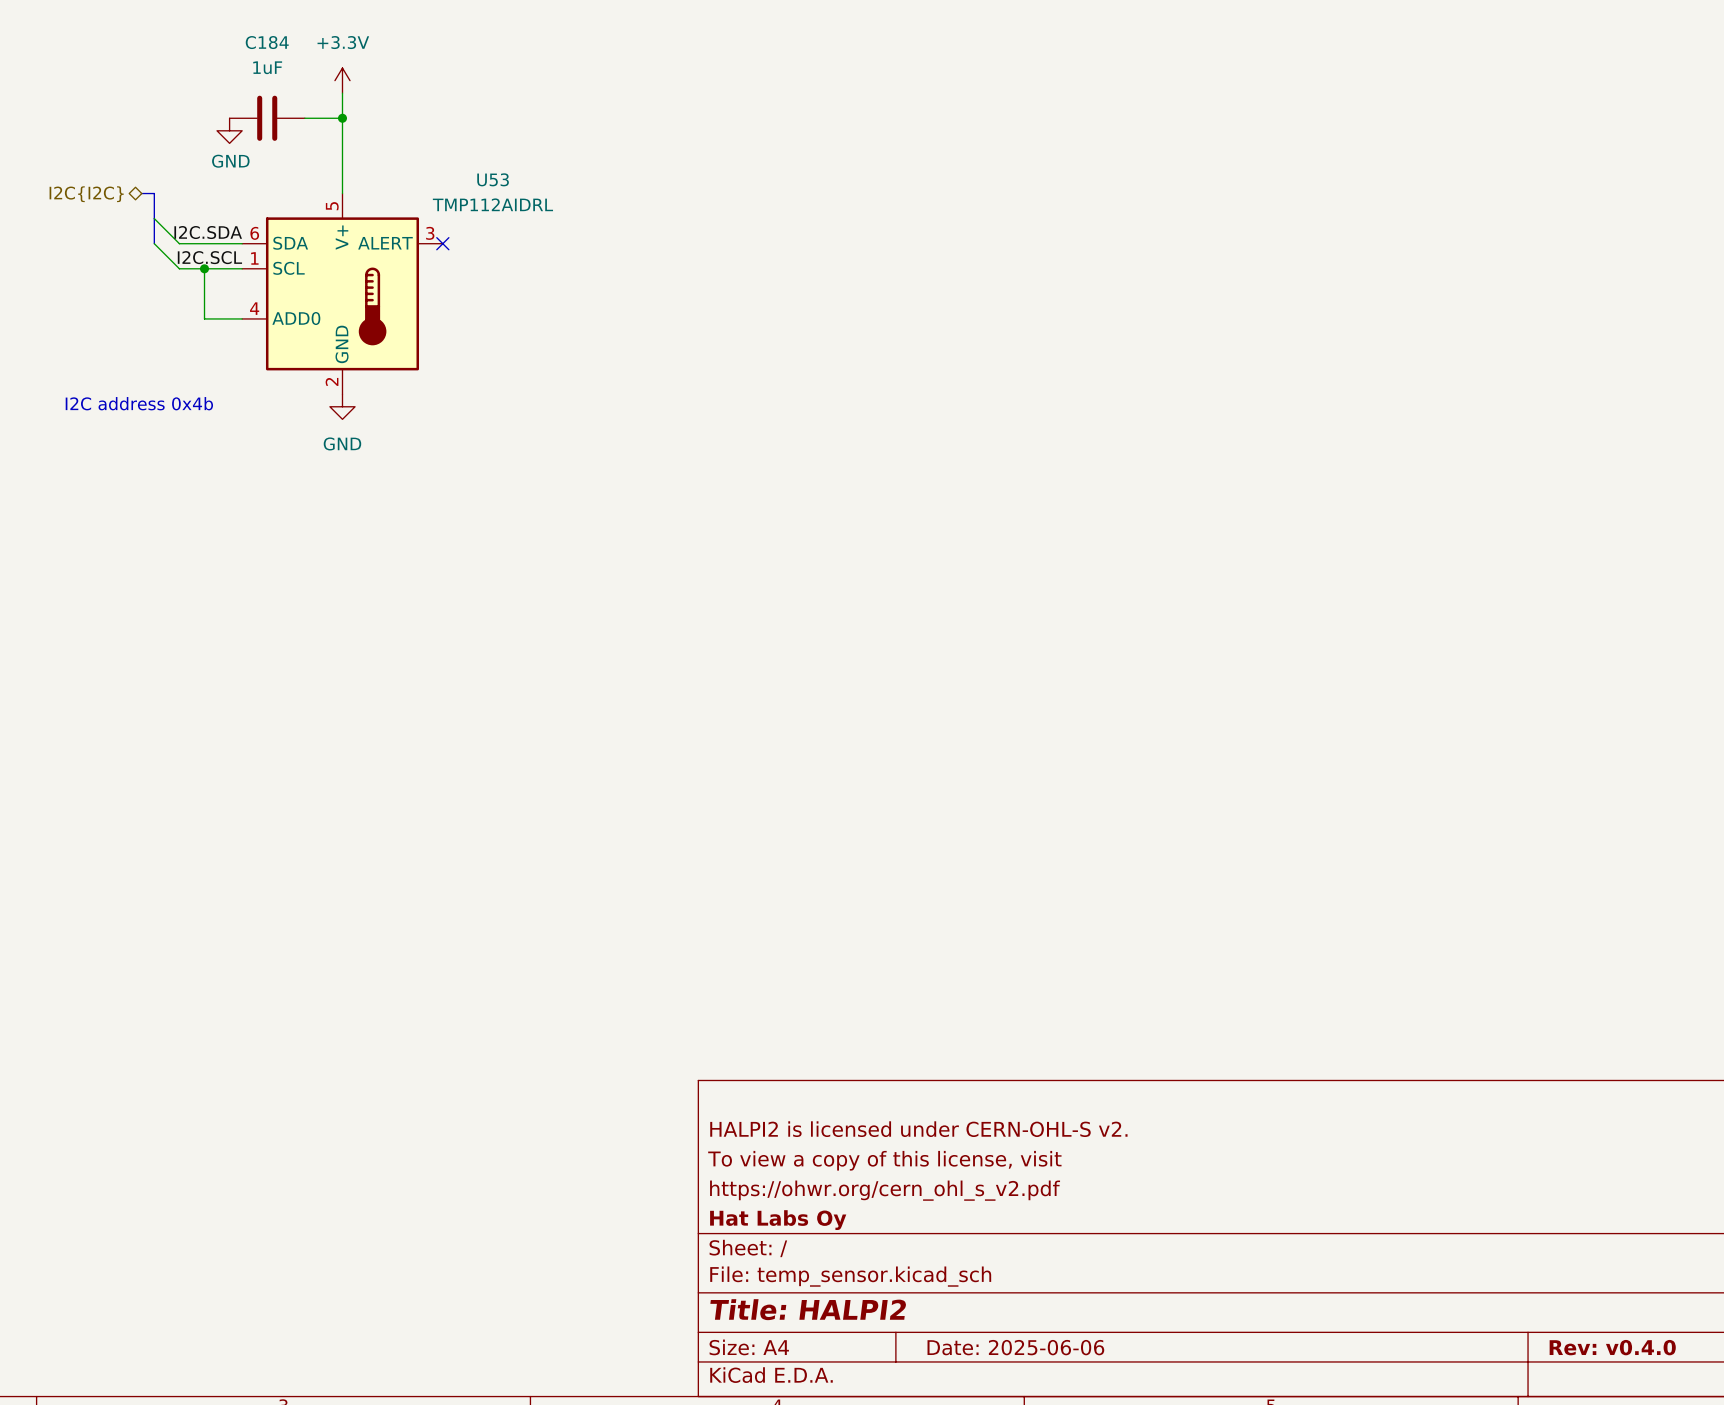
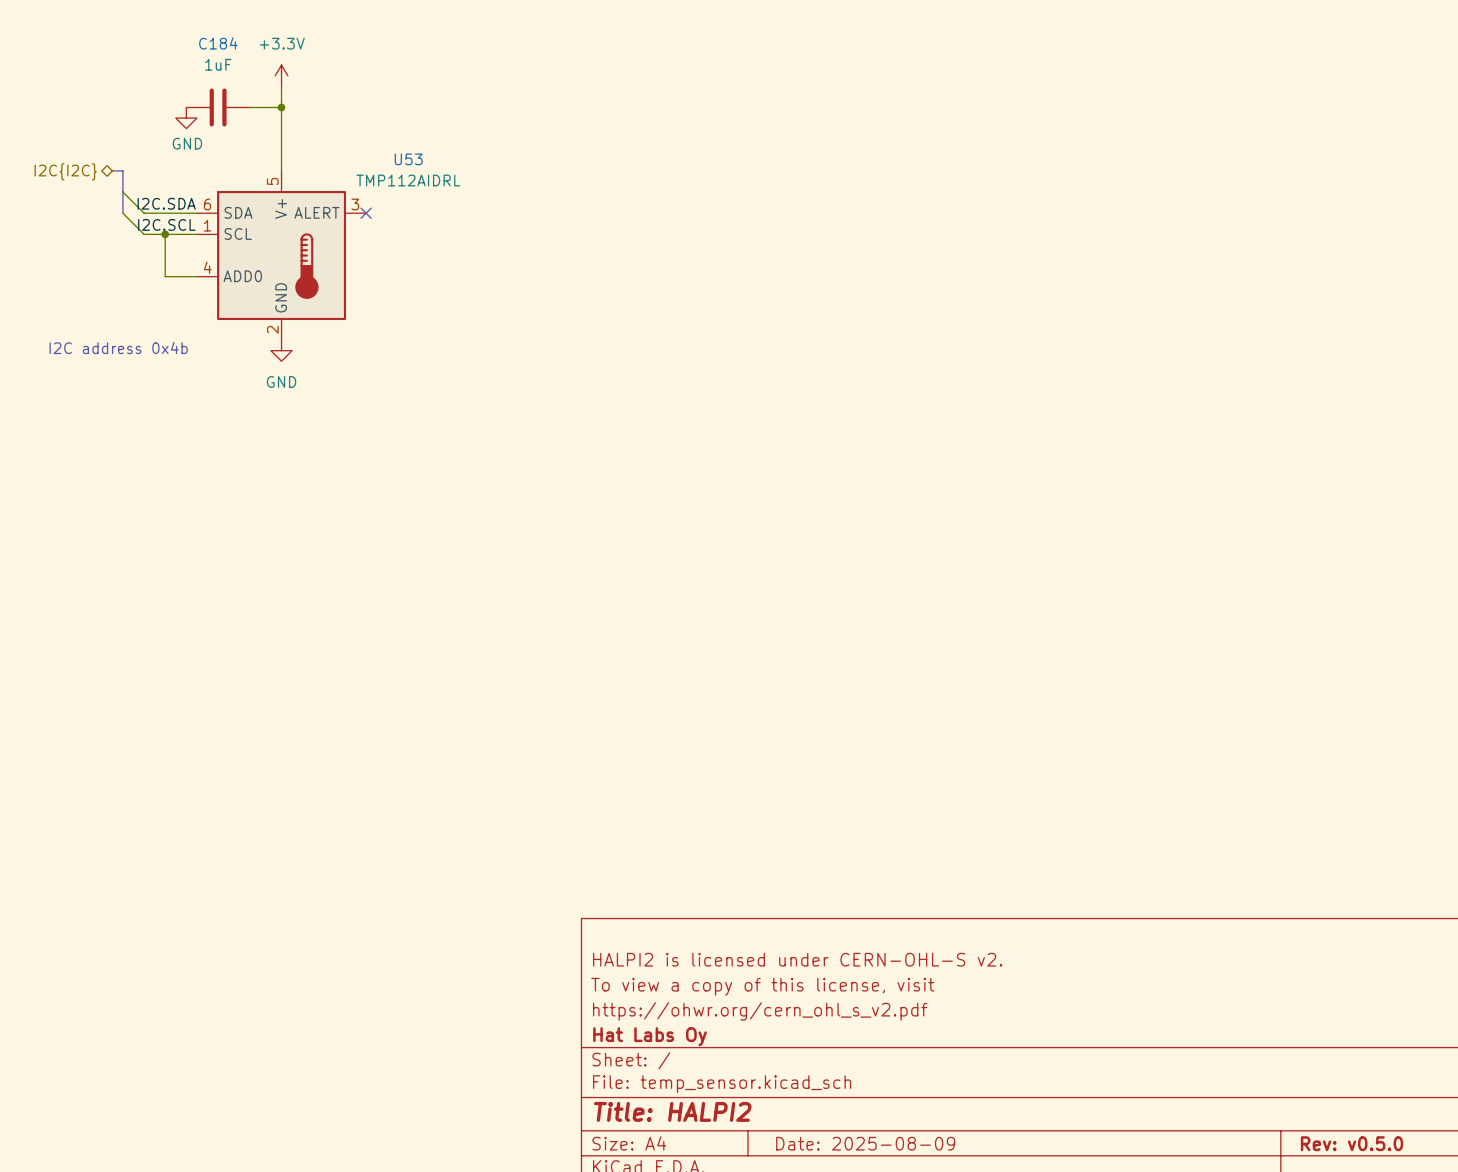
title block: Date: 2025-06-06 (1015, 1347) -> Date: 2025-08-09 (865, 1143)
title block: Rev: v0.4.0 (1612, 1347) -> Rev: v0.5.0 (1352, 1143)

